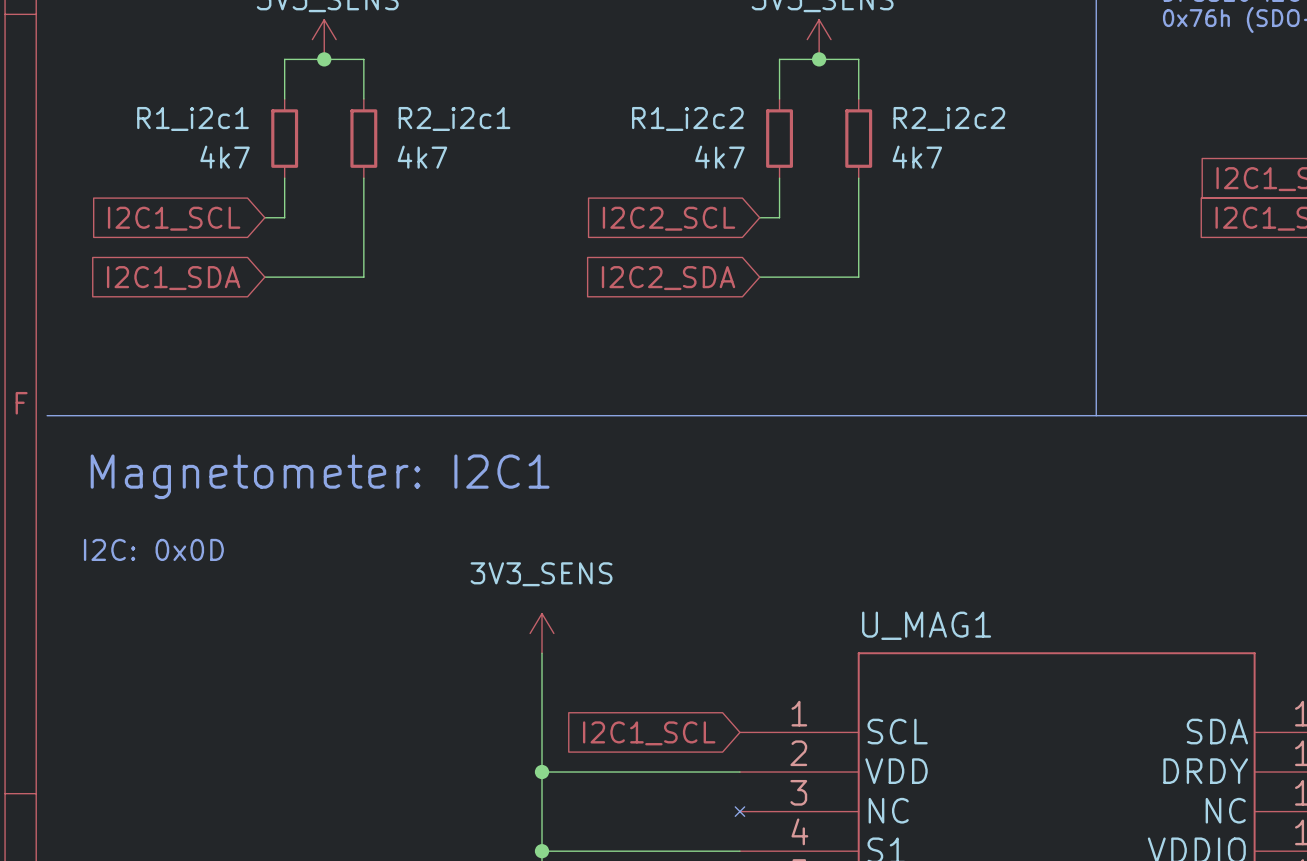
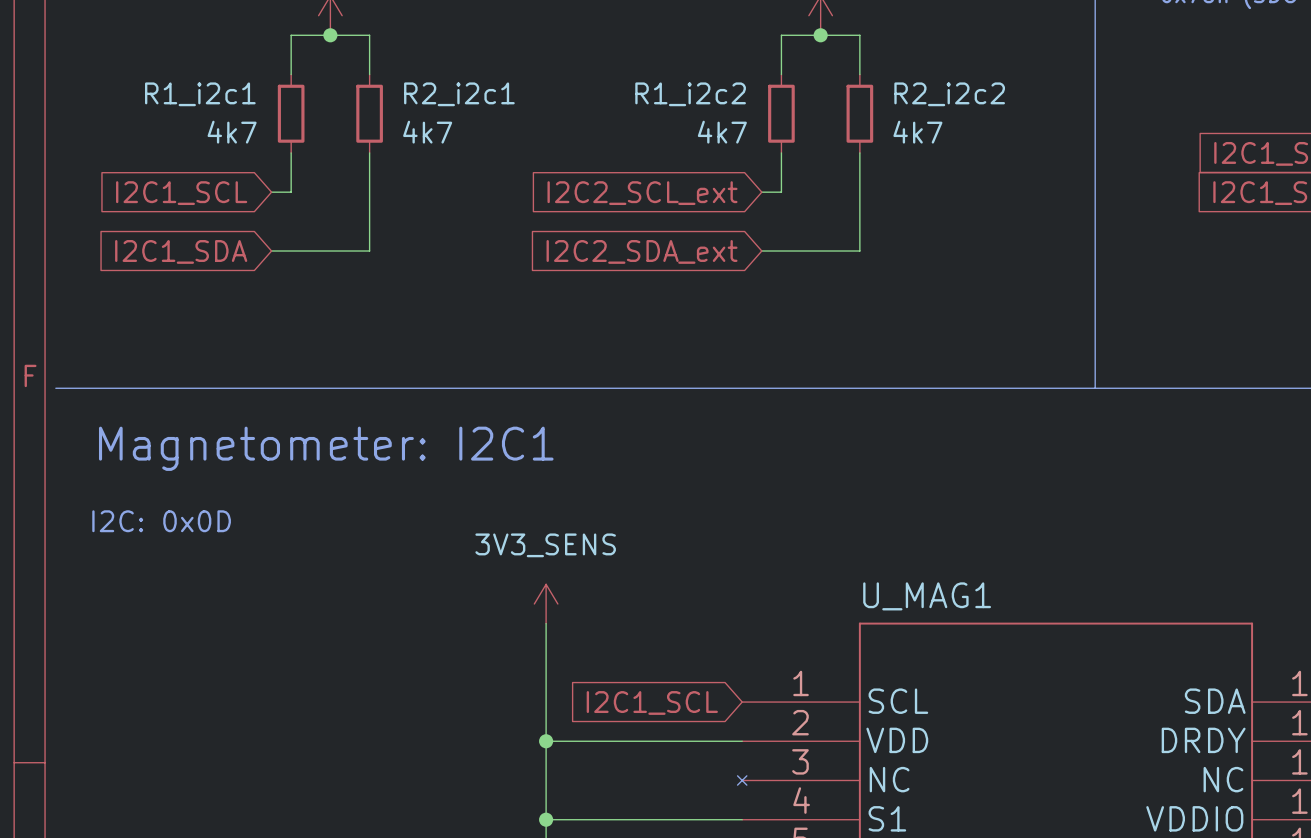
global label: I2C2_SCL (668, 218) -> I2C2_SCL_ext (642, 193)
global label: I2C2_SDA (668, 278) -> I2C2_SDA_ext (642, 251)

